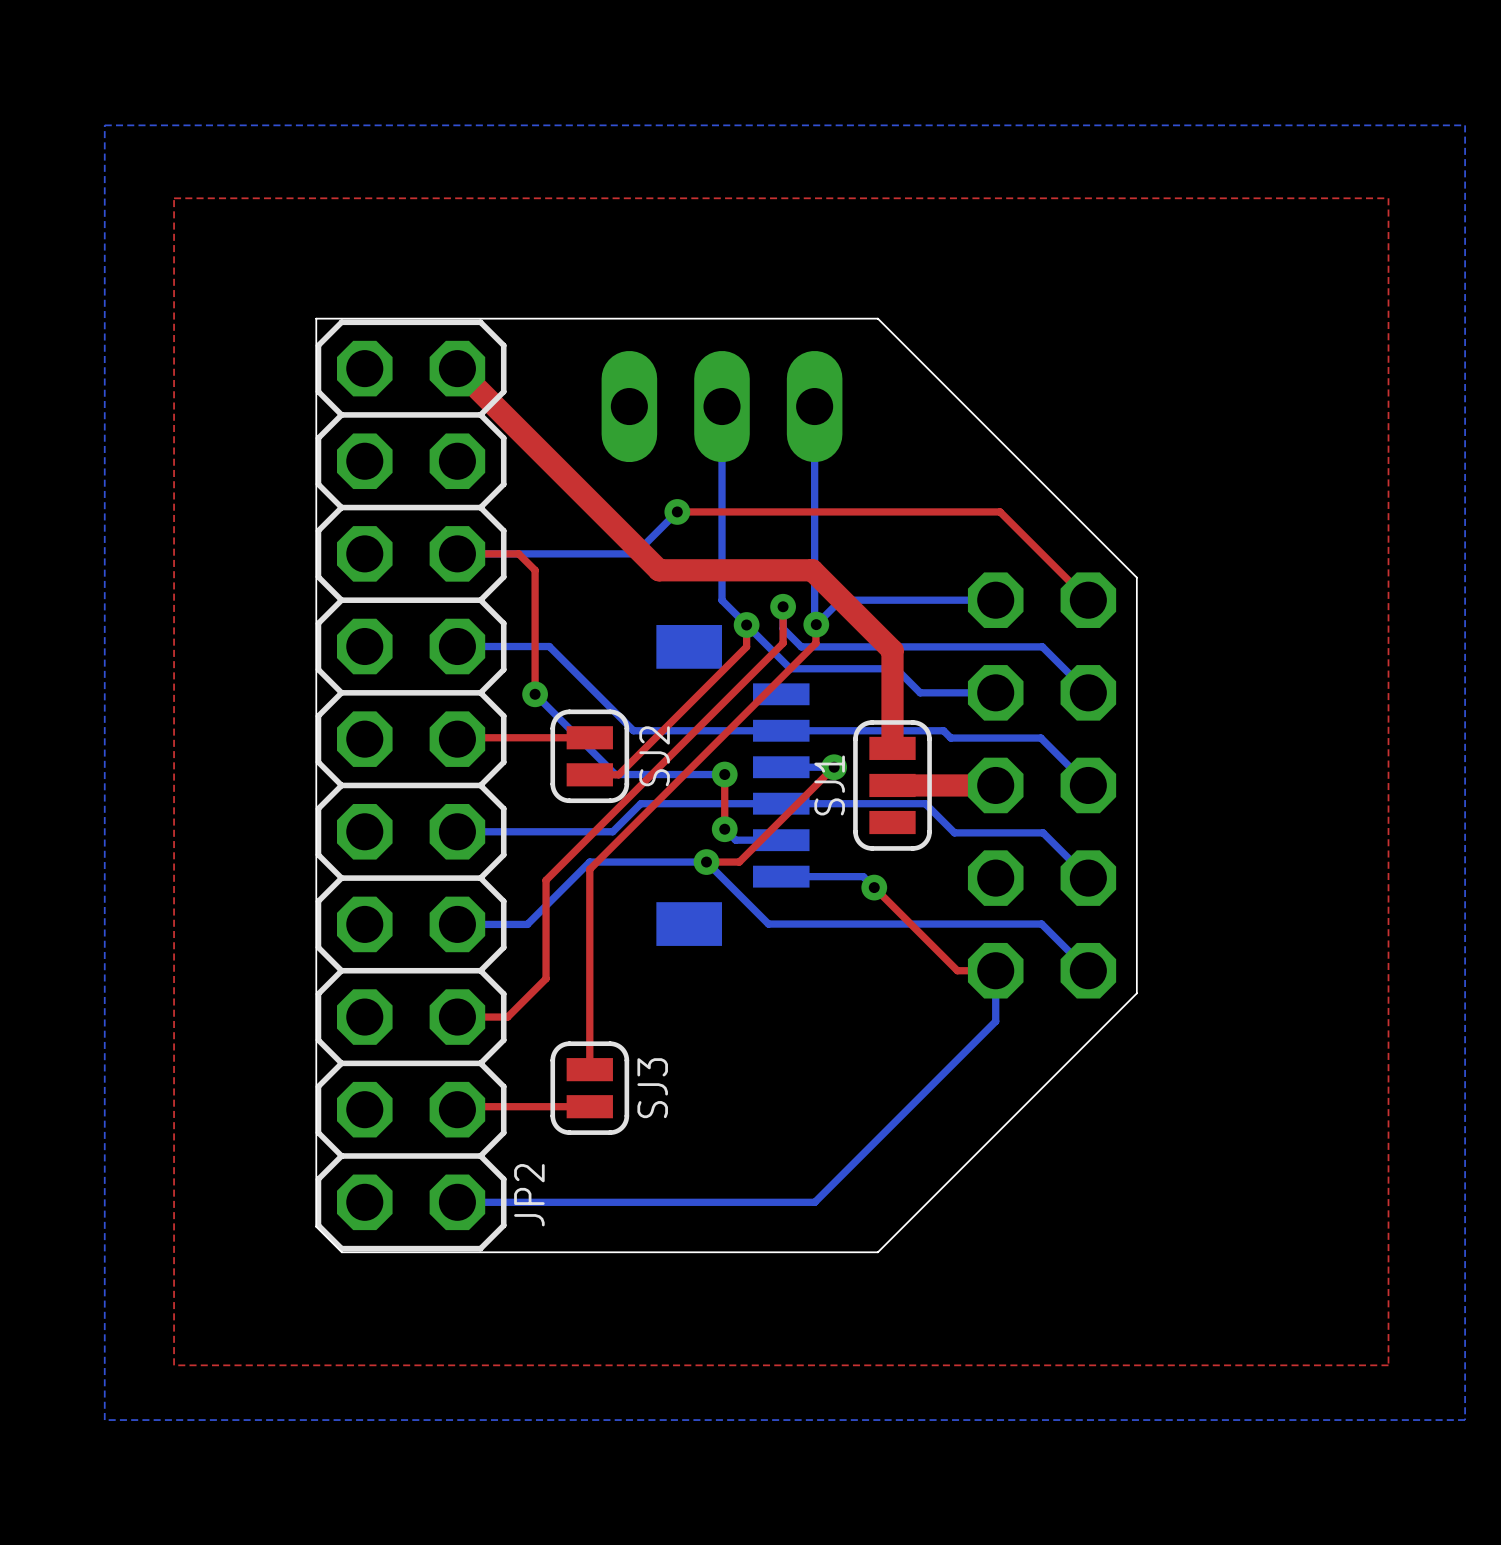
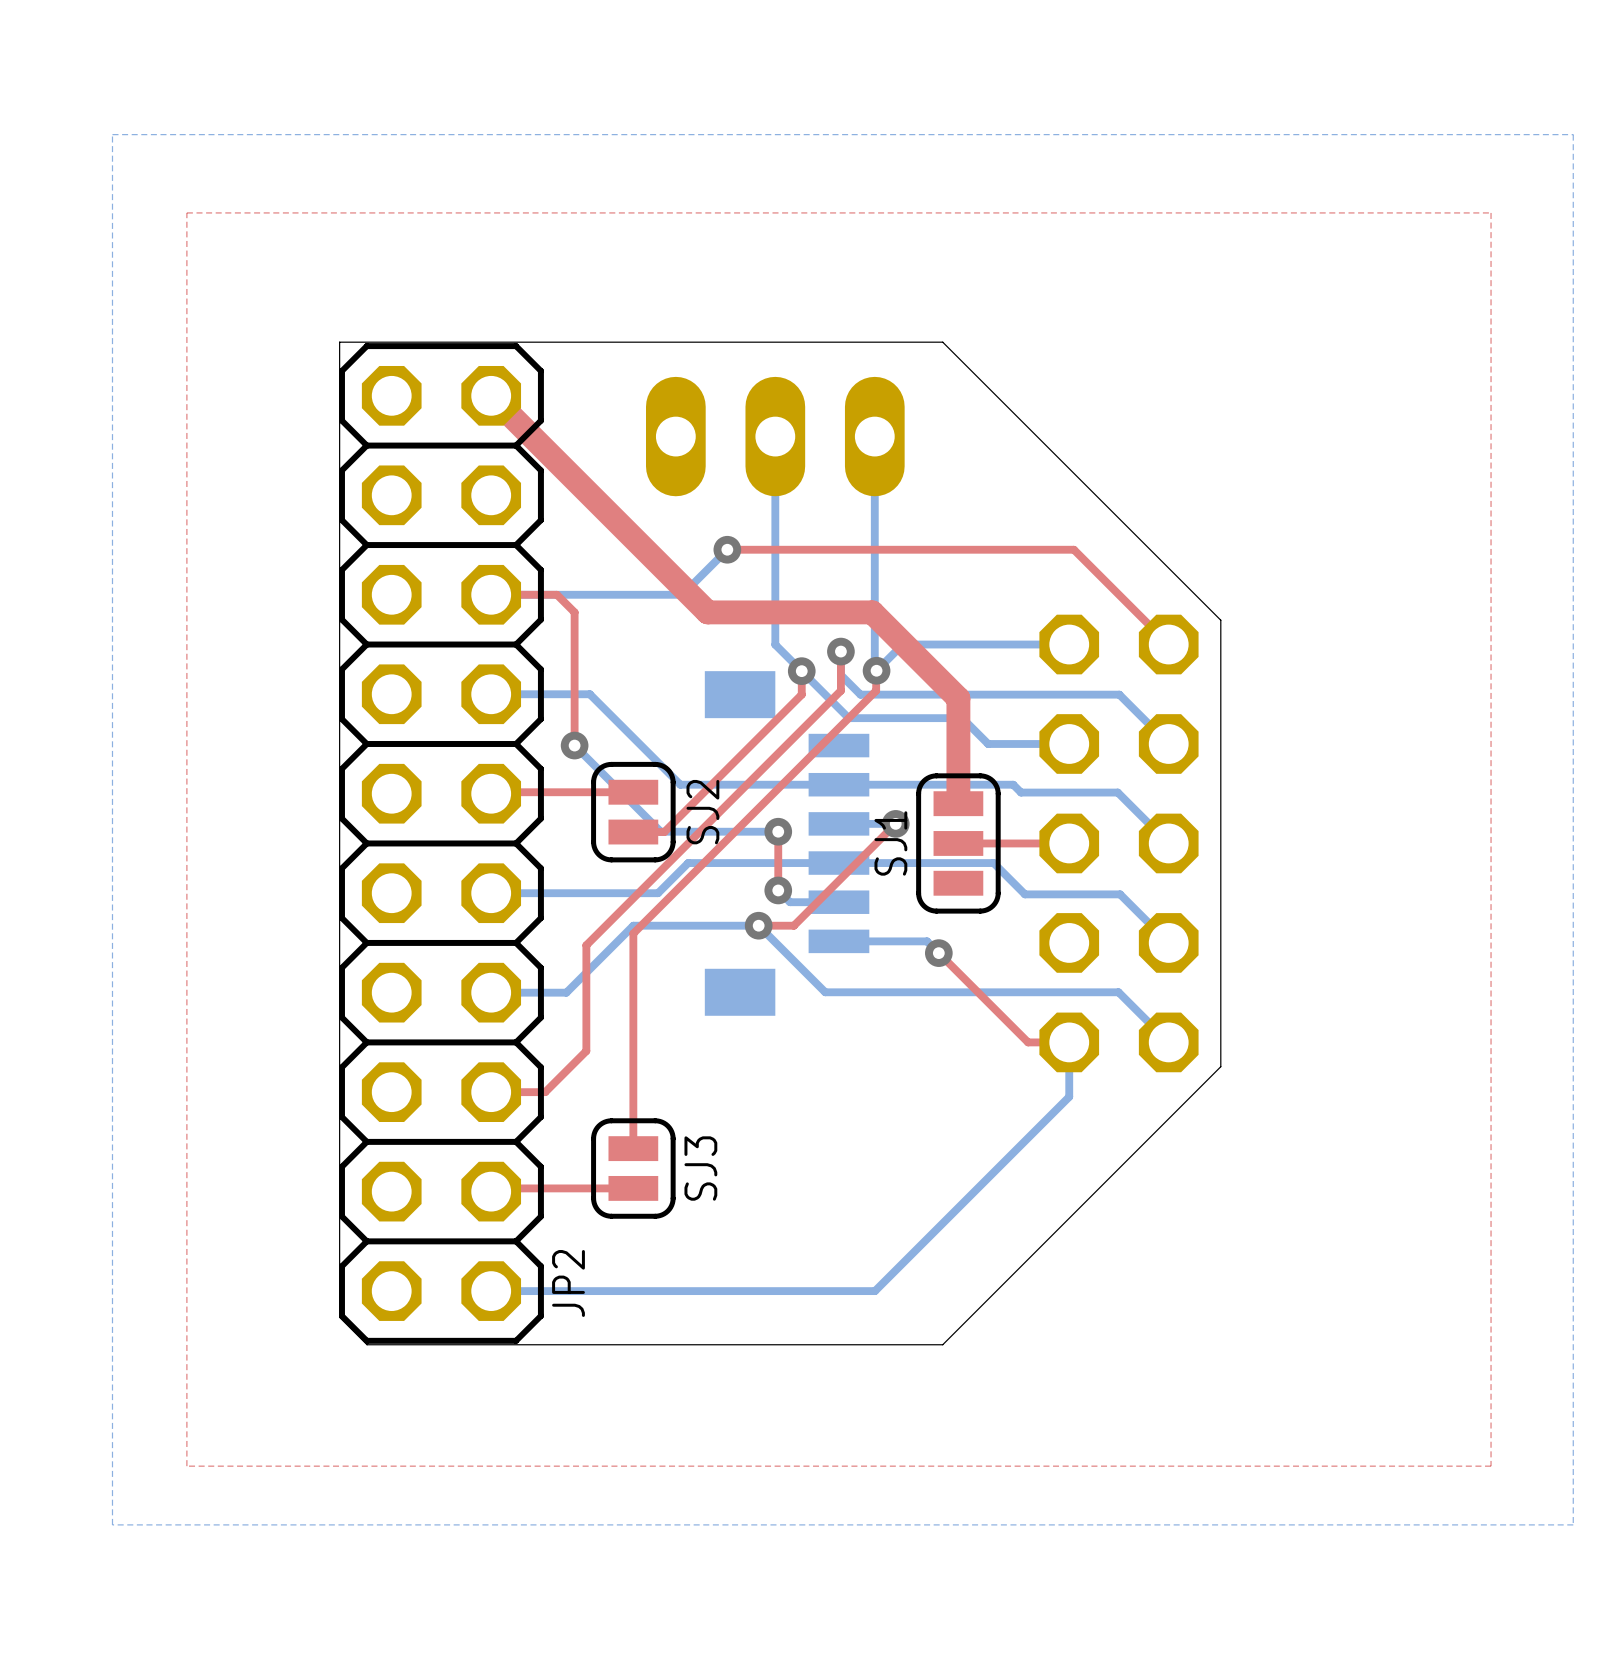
top track width: thick (892, 785) (995, 785) -> thin (958, 843) (1069, 843)

